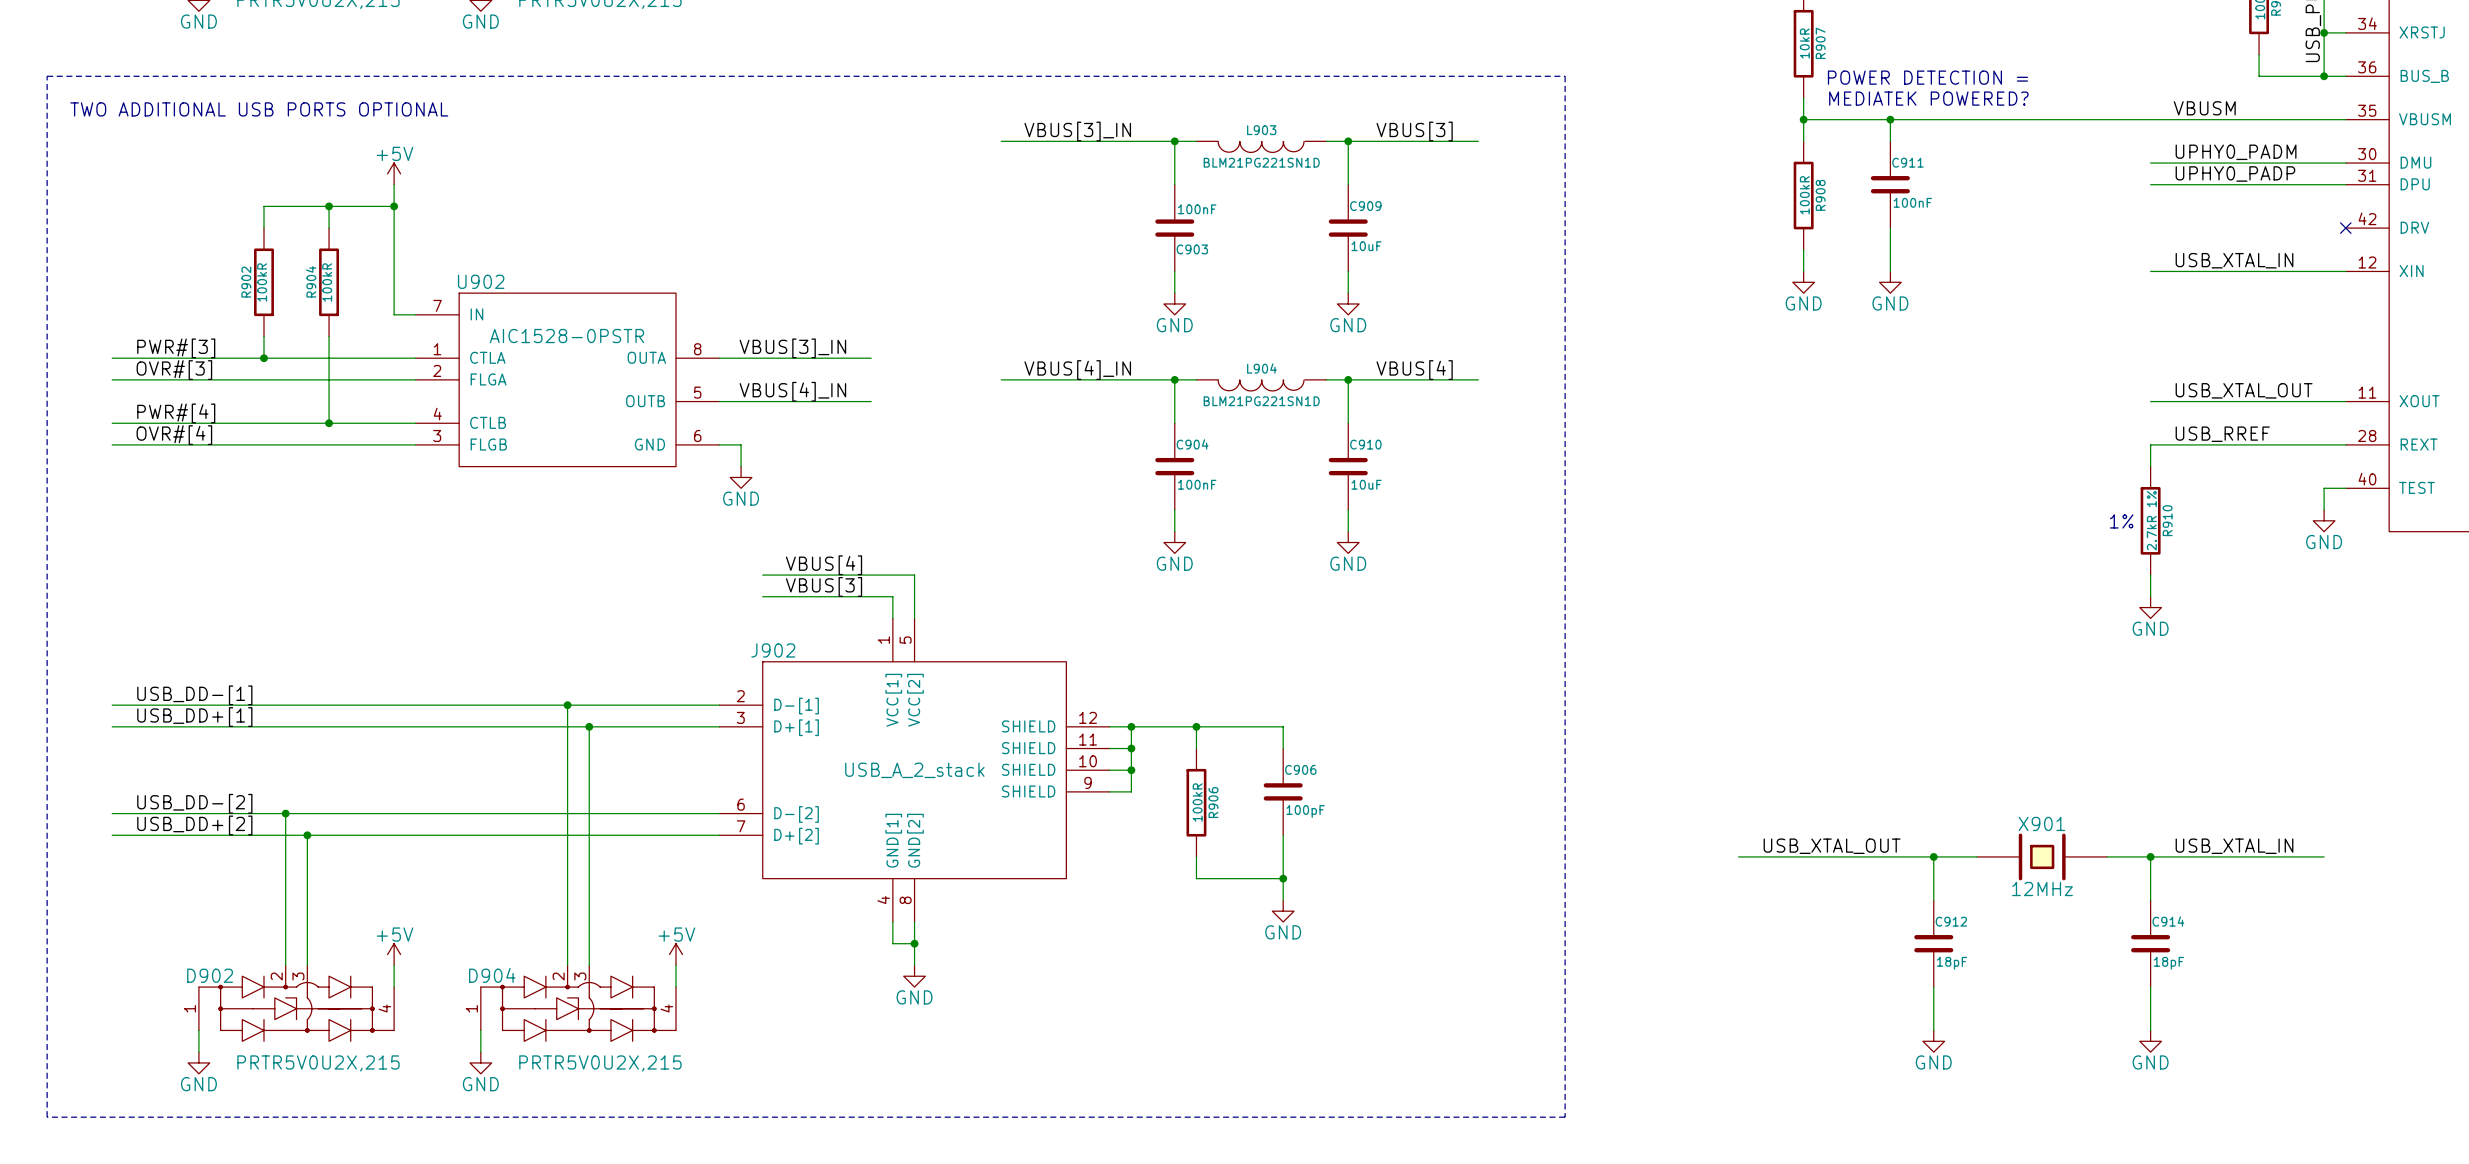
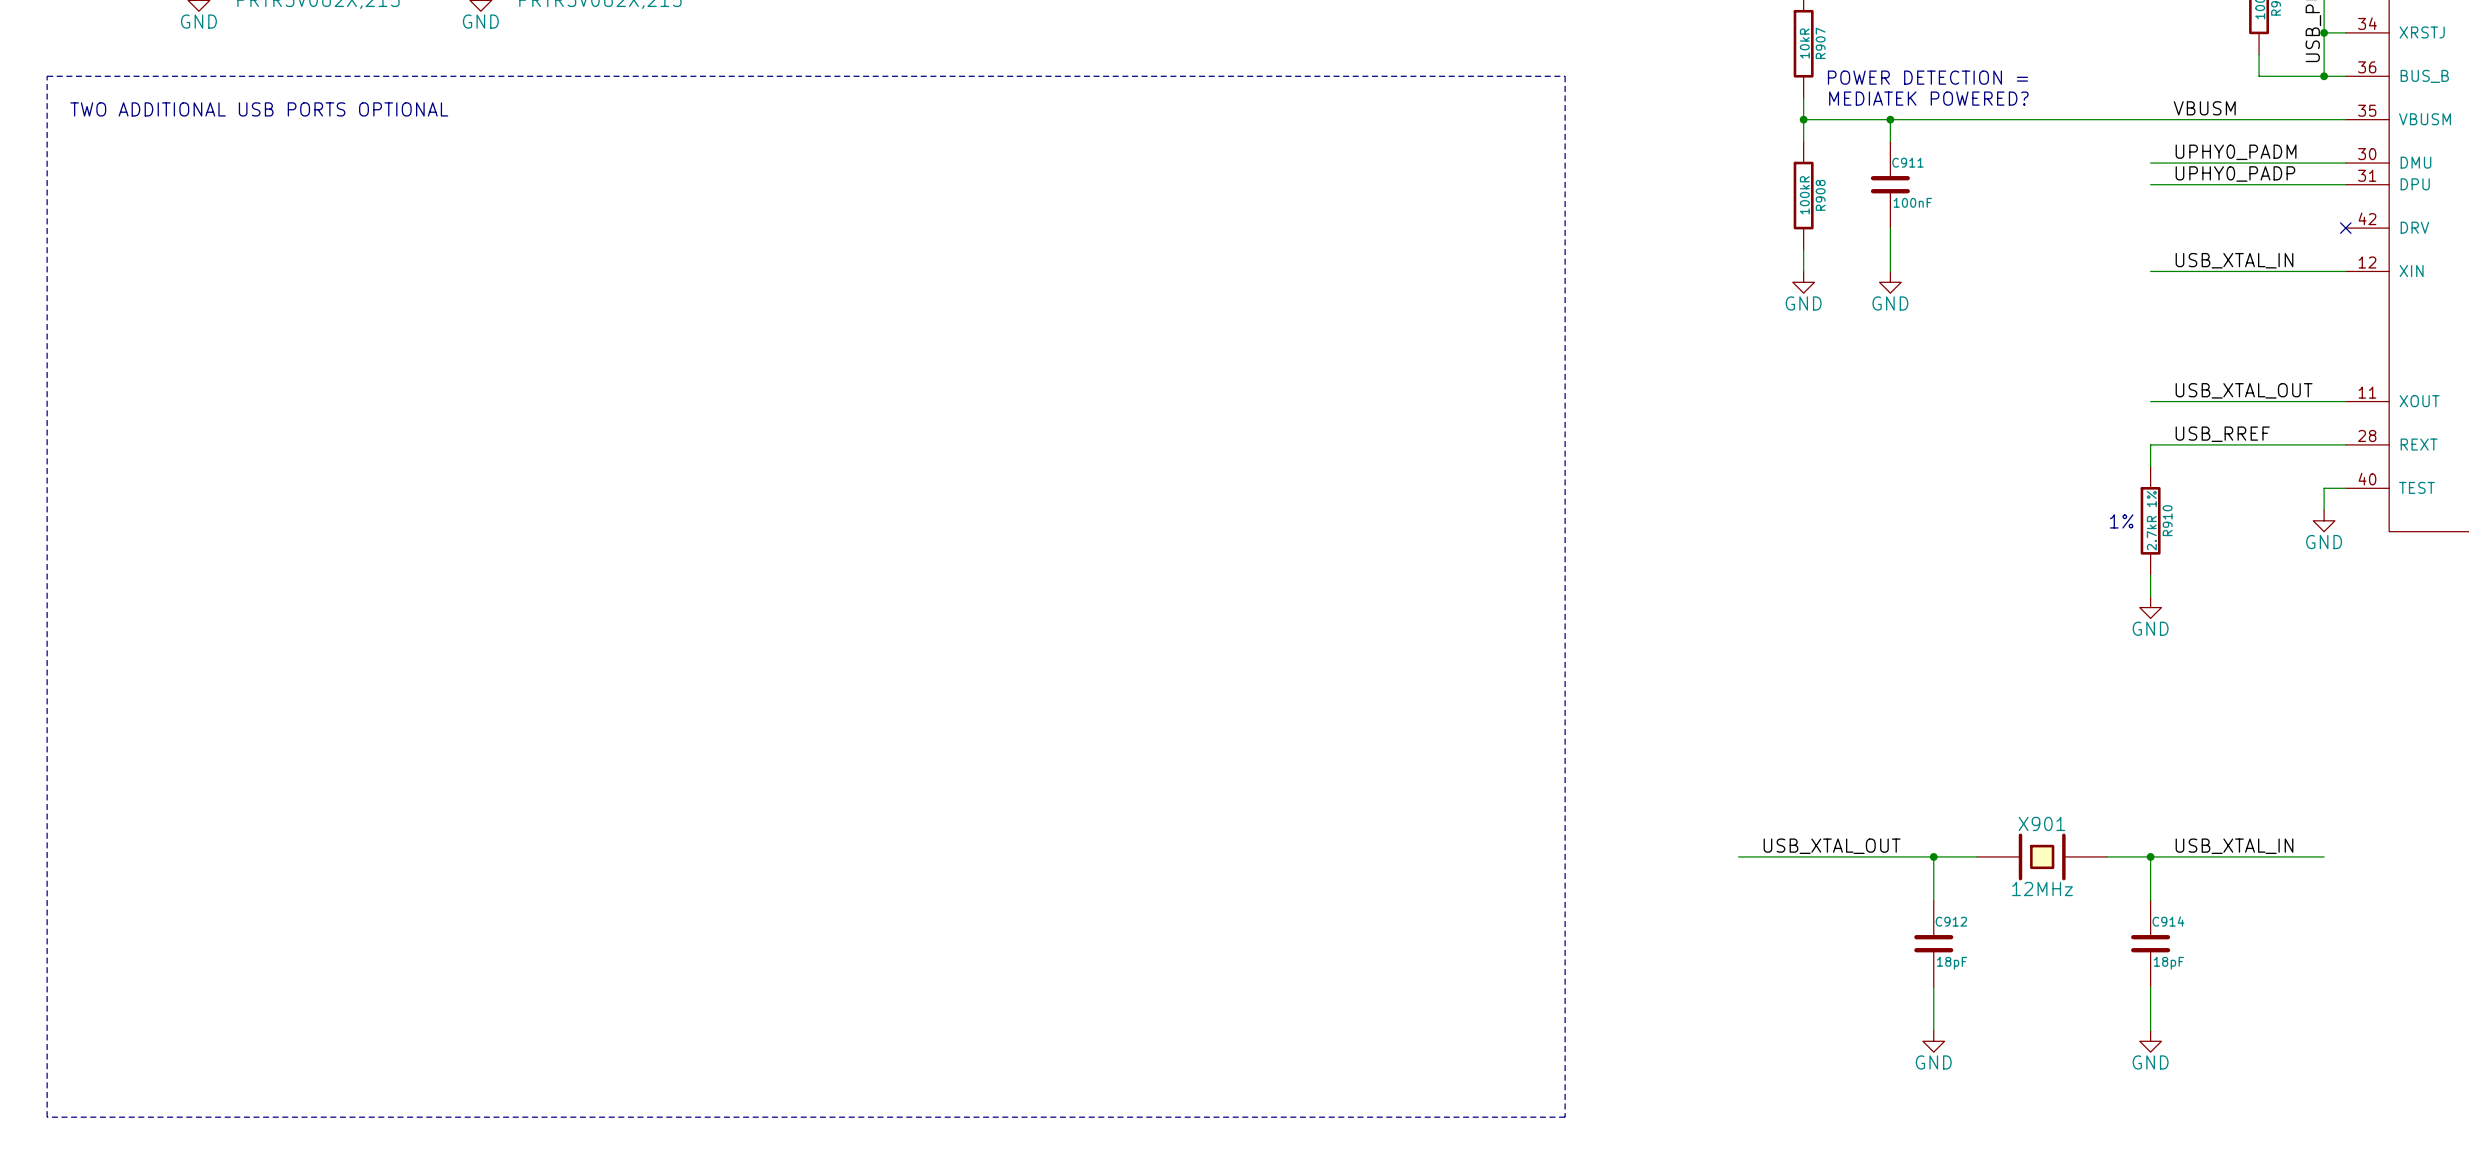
label: VBUS[3]_IN (1077, 131) -> none
label: VBUS[3] (1414, 131) -> none
wire: (1001, 141) (1196, 141) -> none
wire: (1174, 141) (1174, 184) -> none
junction: (1174, 141) -> none
wire: (1326, 141) (1478, 141) -> none
wire: (1348, 141) (1348, 184) -> none
junction: (1348, 141) -> none
L903: BLM21PG221SN1D (1261, 146) -> none
power symbol: +5V (394, 173) -> none
wire: (394, 184) (394, 314) (415, 314) -> none
wire: (329, 206) (329, 228) -> none
junction: (329, 206) -> none
wire: (394, 206) (263, 206) (263, 228) -> none
junction: (394, 206) -> none
C903: 100nF (1174, 228) -> none
C909: 10uF (1348, 228) -> none
wire: (1174, 271) (1174, 293) -> none
wire: (1348, 271) (1348, 293) -> none
R902: 100kR (263, 282) -> none
R904: 100kR (329, 282) -> none
power symbol: GND (1174, 303) -> none
power symbol: GND (1348, 303) -> none
wire: (263, 336) (263, 358) -> none
wire: (329, 336) (329, 423) -> none
label: PWR#[3] (176, 348) -> none
label: VBUS[3]_IN (792, 348) -> none
wire: (112, 358) (415, 358) -> none
junction: (263, 358) -> none
wire: (719, 358) (871, 358) -> none
label: OVR#[3] (174, 370) -> none
label: VBUS[4]_IN (1077, 370) -> none
label: VBUS[4] (1414, 370) -> none
wire: (112, 379) (415, 379) -> none
U902: AIC1528-0PSTR (567, 379) -> none
wire: (1001, 379) (1196, 379) -> none
wire: (1174, 379) (1174, 423) -> none
junction: (1174, 379) -> none
wire: (1326, 379) (1478, 379) -> none
wire: (1348, 379) (1348, 423) -> none
junction: (1348, 379) -> none
L904: BLM21PG221SN1D (1261, 385) -> none
label: VBUS[4]_IN (792, 391) -> none
wire: (719, 401) (871, 401) -> none
label: PWR#[4] (176, 413) -> none
wire: (112, 423) (415, 423) -> none
junction: (329, 423) -> none
label: OVR#[4] (174, 435) -> none
wire: (112, 444) (415, 444) -> none
wire: (719, 444) (741, 444) (741, 466) -> none
C904: 100nF (1174, 466) -> none
C910: 10uF (1348, 466) -> none
power symbol: GND (741, 477) -> none
wire: (1174, 509) (1174, 531) -> none
wire: (1348, 509) (1348, 531) -> none
power symbol: GND (1174, 542) -> none
power symbol: GND (1348, 542) -> none
label: VBUS[4] (824, 565) -> none
wire: (762, 575) (914, 575) (914, 618) -> none
label: VBUS[3] (824, 586) -> none
wire: (762, 596) (892, 596) (892, 618) -> none
label: USB_DD-[1] (194, 695) -> none
wire: (112, 705) (719, 705) -> none
wire: (567, 705) (567, 965) -> none
junction: (567, 705) -> none
label: USB_DD+[1] (194, 717) -> none
wire: (112, 726) (719, 726) -> none
wire: (589, 726) (589, 965) -> none
junction: (589, 726) -> none
wire: (1109, 726) (1283, 726) (1283, 748) -> none
wire: (1131, 726) (1131, 791) (1109, 791) -> none
junction: (1131, 726) -> none
wire: (1196, 726) (1196, 748) -> none
junction: (1196, 726) -> none
wire: (1109, 748) (1131, 748) -> none
junction: (1131, 748) -> none
J902: USB_A_2_stack (914, 770) -> none
wire: (1109, 770) (1131, 770) -> none
junction: (1131, 770) -> none
C906: 100pF (1283, 791) -> none
R906: 100kR (1196, 802) -> none
label: USB_DD-[2] (194, 803) -> none
wire: (112, 813) (719, 813) -> none
wire: (285, 813) (285, 965) -> none
junction: (285, 813) -> none
label: USB_DD+[2] (194, 825) -> none
wire: (112, 835) (719, 835) -> none
wire: (307, 835) (307, 965) -> none
junction: (307, 835) -> none
wire: (1283, 835) (1283, 900) -> none
wire: (1196, 856) (1196, 878) (1283, 878) -> none
junction: (1283, 878) -> none
power symbol: GND (1283, 911) -> none
wire: (892, 922) (892, 943) (914, 943) -> none
wire: (914, 922) (914, 965) -> none
junction: (914, 943) -> none
power symbol: +5V (394, 954) -> none
power symbol: +5V (676, 954) -> none
wire: (394, 965) (394, 987) -> none
wire: (676, 965) (676, 987) -> none
power symbol: GND (914, 976) -> none
D902: PRTR5V0U2X,215 (296, 1003) -> none
D904: PRTR5V0U2X,215 (578, 1003) -> none
wire: (198, 1030) (198, 1052) -> none
wire: (480, 1030) (480, 1052) -> none
power symbol: GND (198, 1062) -> none
power symbol: GND (480, 1062) -> none

